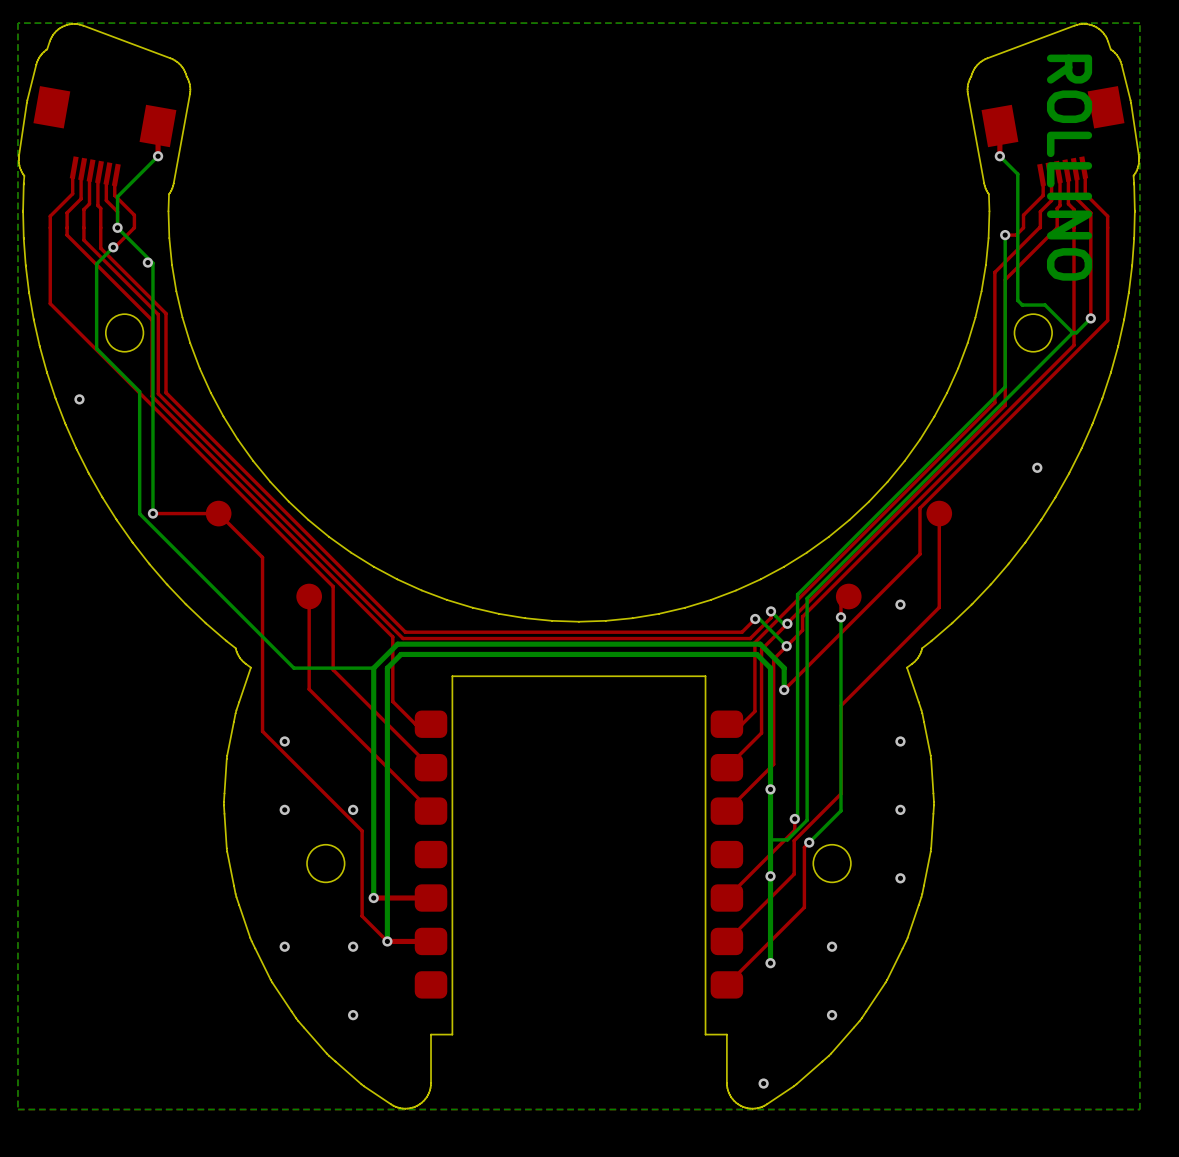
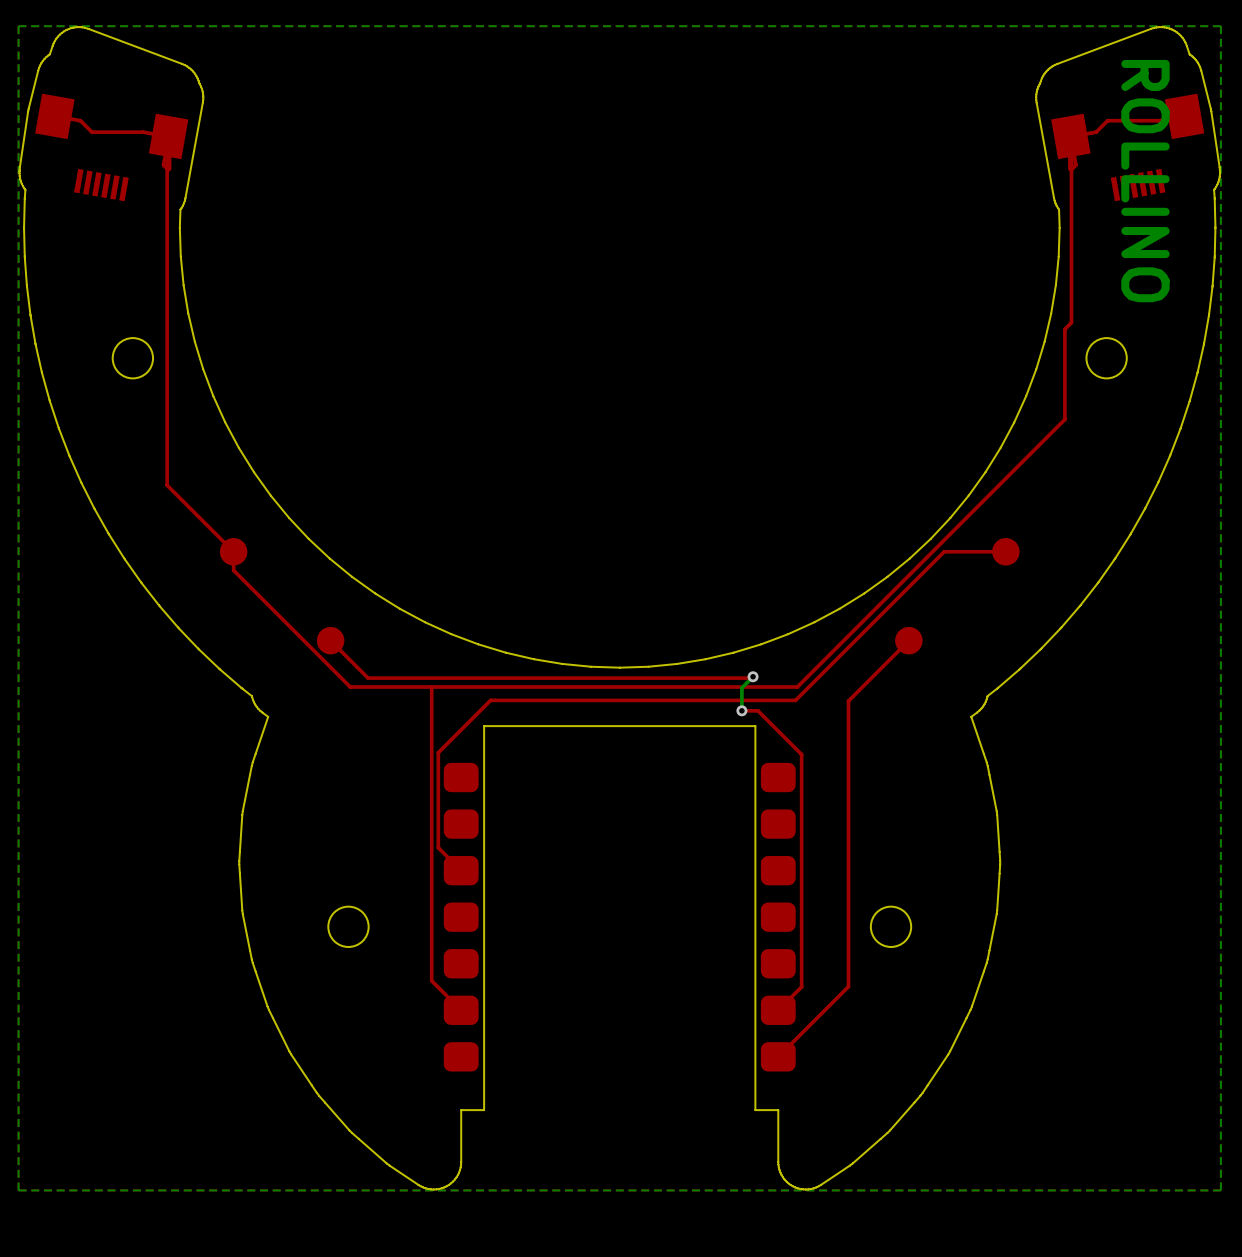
top track: none -> (1184, 116) (1159, 120) (1107, 120) (1096, 132) (1070, 136) (1075, 165) (1071, 169) (1071, 322) (1064, 329) (1064, 419) (797, 687) (350, 687) (233, 570) (233, 551) (167, 485) (167, 168) (163, 165) (168, 136) (143, 132) (91, 132) (80, 120) (55, 116)
bottom track: (158, 156) (117, 196) (117, 227) (152, 263) (152, 513) -> none
via: (158, 156) -> none
bottom track: (999, 156) (1017, 174) (1017, 300) (1022, 305) (1045, 305) (1072, 332) -> none
via: (999, 156) -> none
top track: (72, 175) (72, 193) (50, 216) (50, 303) (333, 586) (333, 669) (431, 767) -> none
top track: (1085, 175) (1085, 193) (1107, 216) (1107, 320) (919, 508) (919, 554) (784, 689) -> none
top track: (81, 176) (81, 198) (67, 212) (67, 235) (152, 320) (152, 396) (392, 637) (392, 701) (415, 724) (431, 724) -> none
top track: (1076, 176) (1076, 198) (1090, 212) (1090, 318) -> none
top track: (89, 178) (89, 203) (83, 209) (83, 240) (158, 314) (158, 393) (403, 638) (750, 638) (770, 617) (770, 611) -> none
top track: (1068, 178) (1068, 203) (1074, 209) (1074, 345) (802, 616) (802, 630) (773, 659) (773, 764) (726, 811) -> none
top track: (97, 179) (97, 205) (100, 208) (100, 248) (166, 313) (166, 392) (405, 632) (742, 632) (755, 619) -> none
top track: (1060, 179) (1060, 205) (1057, 208) (1057, 227) (1005, 279) (1005, 405) (761, 649) (761, 733) (726, 767) -> none
top track: (106, 181) (106, 200) (117, 211) (117, 227) -> none
top track: (1051, 181) (1051, 200) (1040, 211) (1040, 227) -> none
top track: (114, 182) (114, 195) (134, 215) (134, 227) (113, 247) -> none
top track: (1043, 182) (1043, 195) (1023, 215) (1023, 227) (1016, 235) (1005, 235) -> none
top track: (1040, 226) (994, 272) (994, 402) (754, 642) (754, 711) (742, 724) (726, 724) -> none
via: (117, 227) -> none
bottom track: (1005, 235) (1005, 386) (797, 594) (797, 816) (794, 818) -> none
via: (1005, 235) -> none
bottom track: (113, 247) (96, 263) (96, 348) (139, 391) (139, 513) (293, 668) (373, 668) -> none
via: (113, 247) -> none
via: (147, 262) -> none
bottom track: (1090, 318) (1076, 332) (1072, 332) -> none
via: (1090, 318) -> none
bottom track: (1072, 332) (807, 598) (807, 820) (787, 839) (770, 839) -> none
via: (79, 399) -> none
via: (1037, 467) -> none
top track: (152, 513) (218, 513) (262, 557) (262, 731) (362, 830) (362, 916) (387, 941) (431, 941) -> (431, 687) (431, 980) (461, 1010)
via: (152, 513) -> none
top track: (939, 513) (939, 607) (841, 705) (841, 793) (794, 840) (794, 874) (748, 919) -> (741, 710) (757, 710) (801, 754) (801, 986)
top track: none -> (1005, 551) (944, 551) (795, 700) (490, 700) (438, 752) (438, 847)
top track: (309, 596) (309, 689) (409, 789) -> (330, 640) (368, 678) (753, 676)
top track: (840, 604) (840, 617) -> none
via: (900, 604) -> none
bottom track: (770, 611) (783, 623) (787, 623) -> none
via: (770, 611) -> none
bottom track: (840, 617) (840, 810) (809, 842) -> none
via: (840, 617) -> none
bottom track: (755, 619) (759, 619) (786, 646) -> none
via: (755, 619) -> none
via: (787, 623) -> none
bottom track: none -> (753, 676) (741, 687) (741, 710)
via: none -> (753, 676)
via: (786, 646) -> none
via: none -> (741, 710)
bottom track: (373, 668) (397, 644) (760, 644) (784, 668) (784, 689) (784, 683) -> none
bottom track: (373, 668) (373, 898) -> none
via: (784, 689) -> none
via: (284, 741) -> none
via: (900, 741) -> none
via: (770, 789) -> none
via: (284, 809) -> none
via: (353, 809) -> none
via: (900, 809) -> none
top track: (794, 818) (794, 830) (726, 898) -> none
via: (794, 818) -> none
top track: (809, 842) (804, 847) (804, 907) (792, 919) -> (900, 649) (848, 701) (848, 986)
via: (809, 842) -> none
via: (770, 876) -> none
via: (900, 878) -> none
via: (373, 898) -> none
top track: (431, 898) (373, 898) -> none
bottom track: (387, 941) (387, 668) (401, 654) (756, 654) (770, 668) (770, 963) -> none
via: (387, 941) -> none
via: (284, 946) -> none
via: (353, 946) -> none
via: (832, 946) -> none
via: (770, 963) -> none
via: (353, 1015) -> none
via: (832, 1015) -> none
via: (763, 1083) -> none

